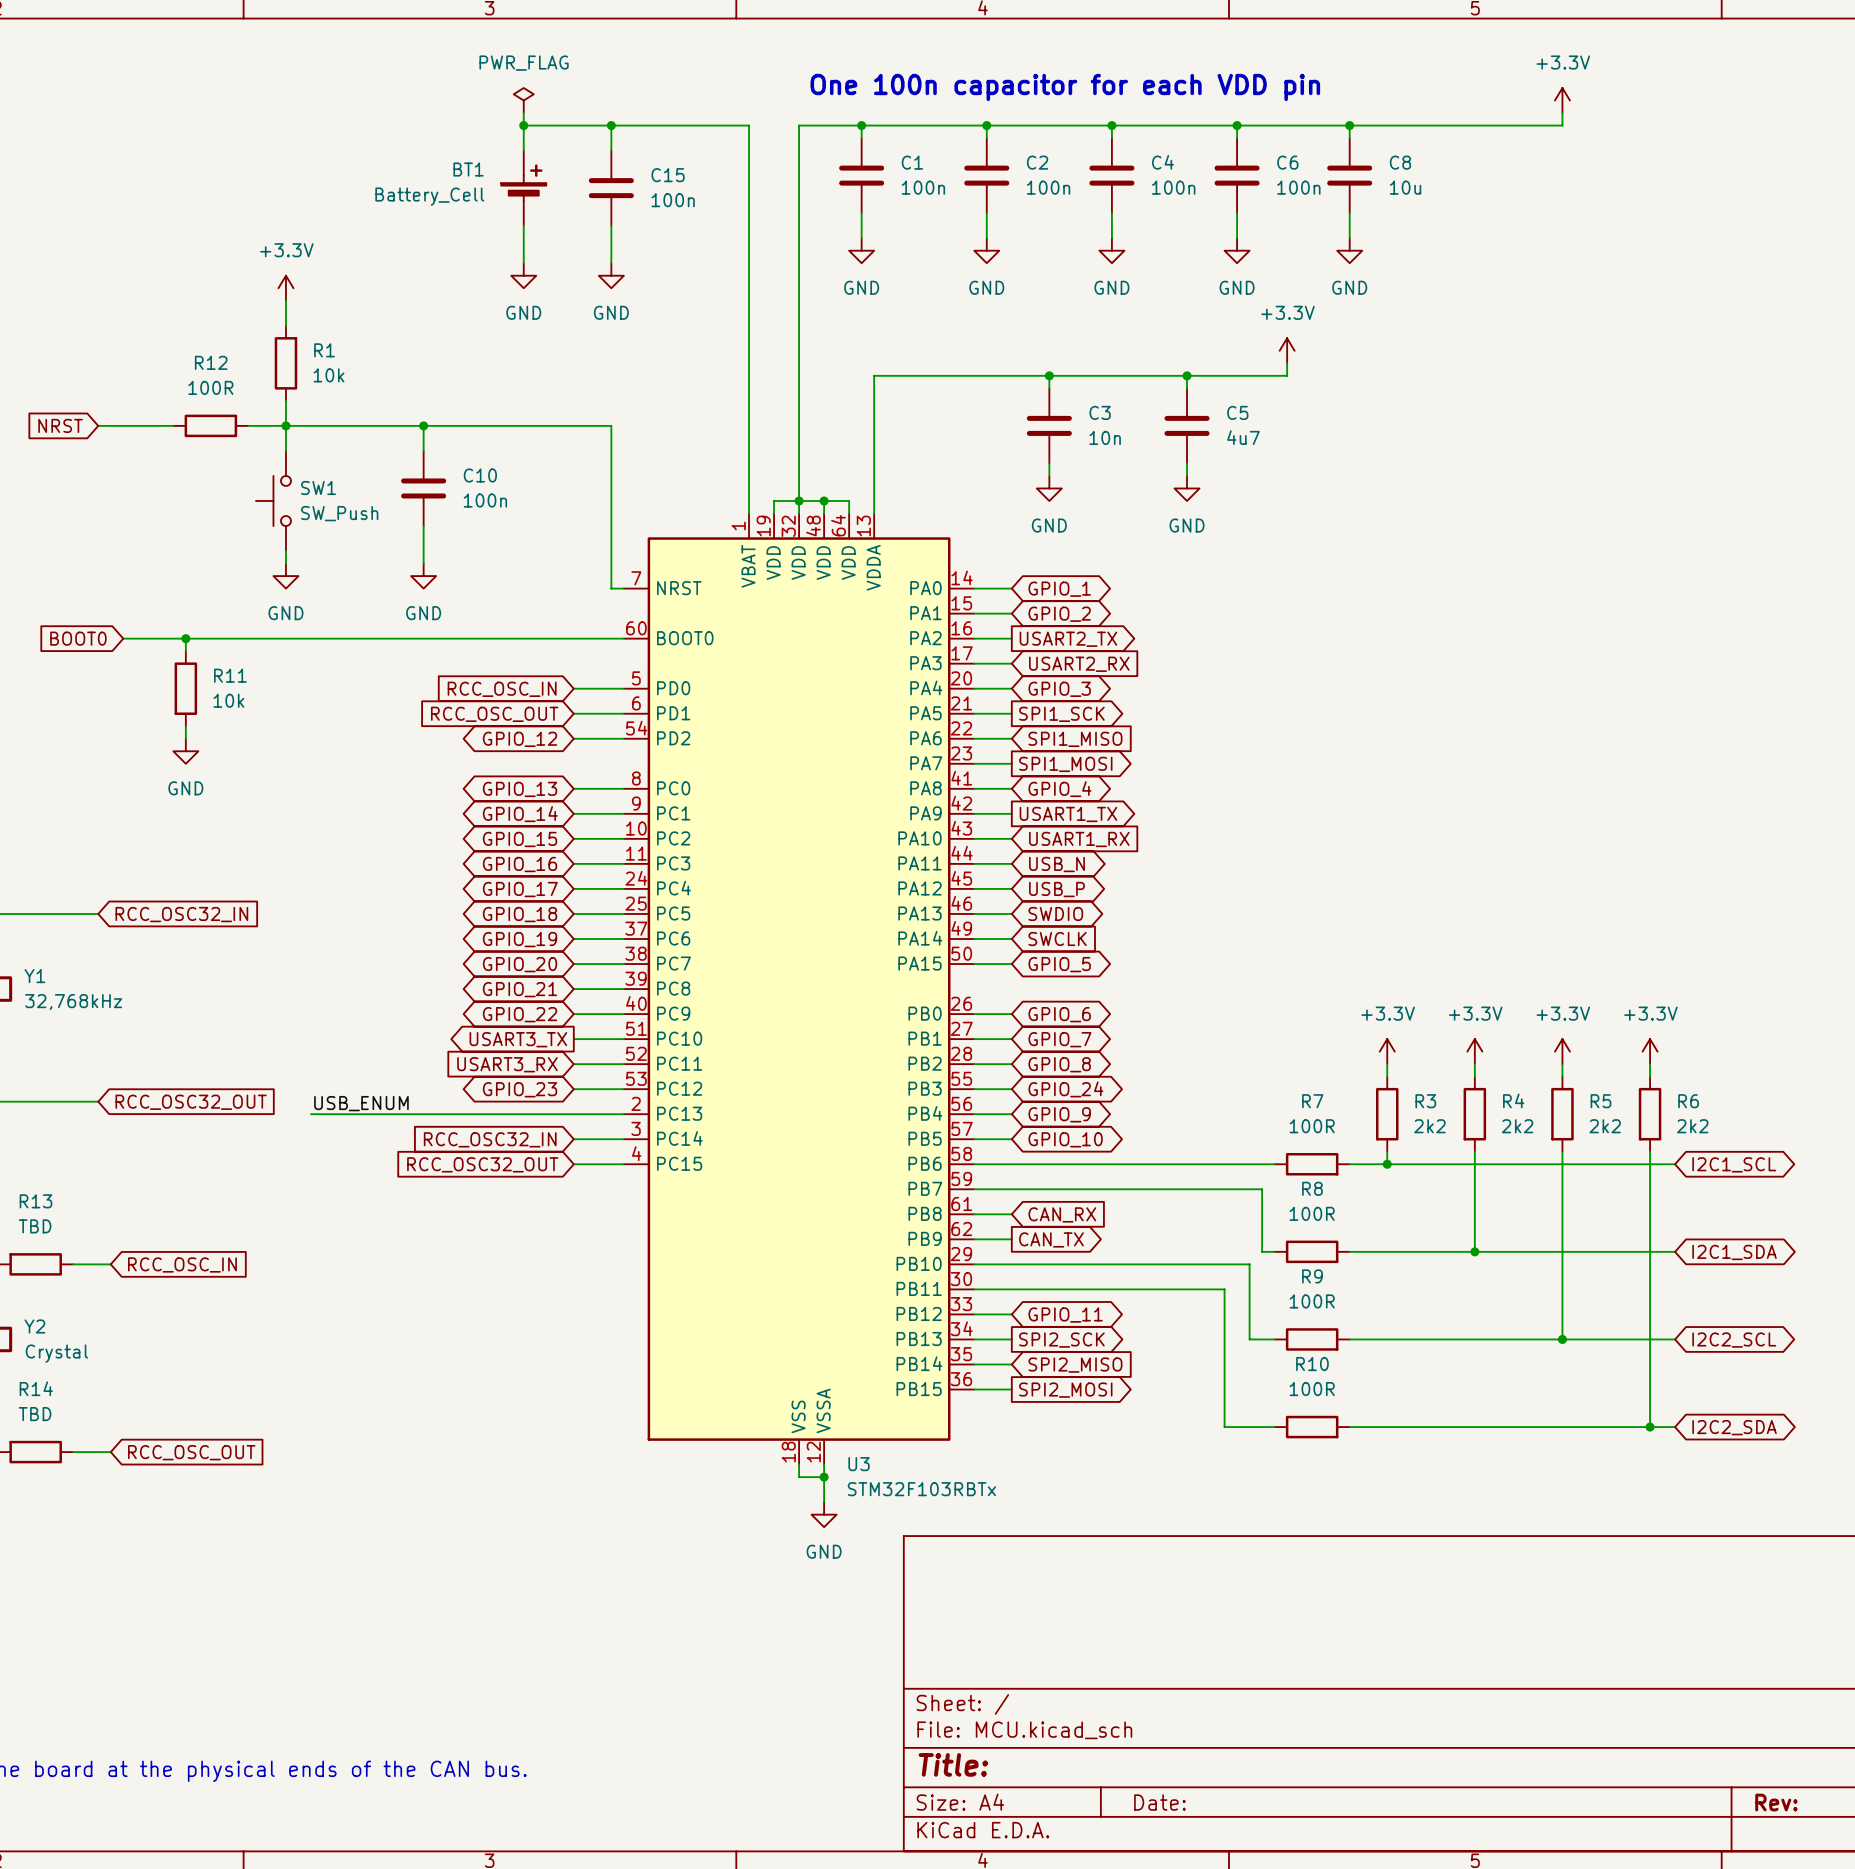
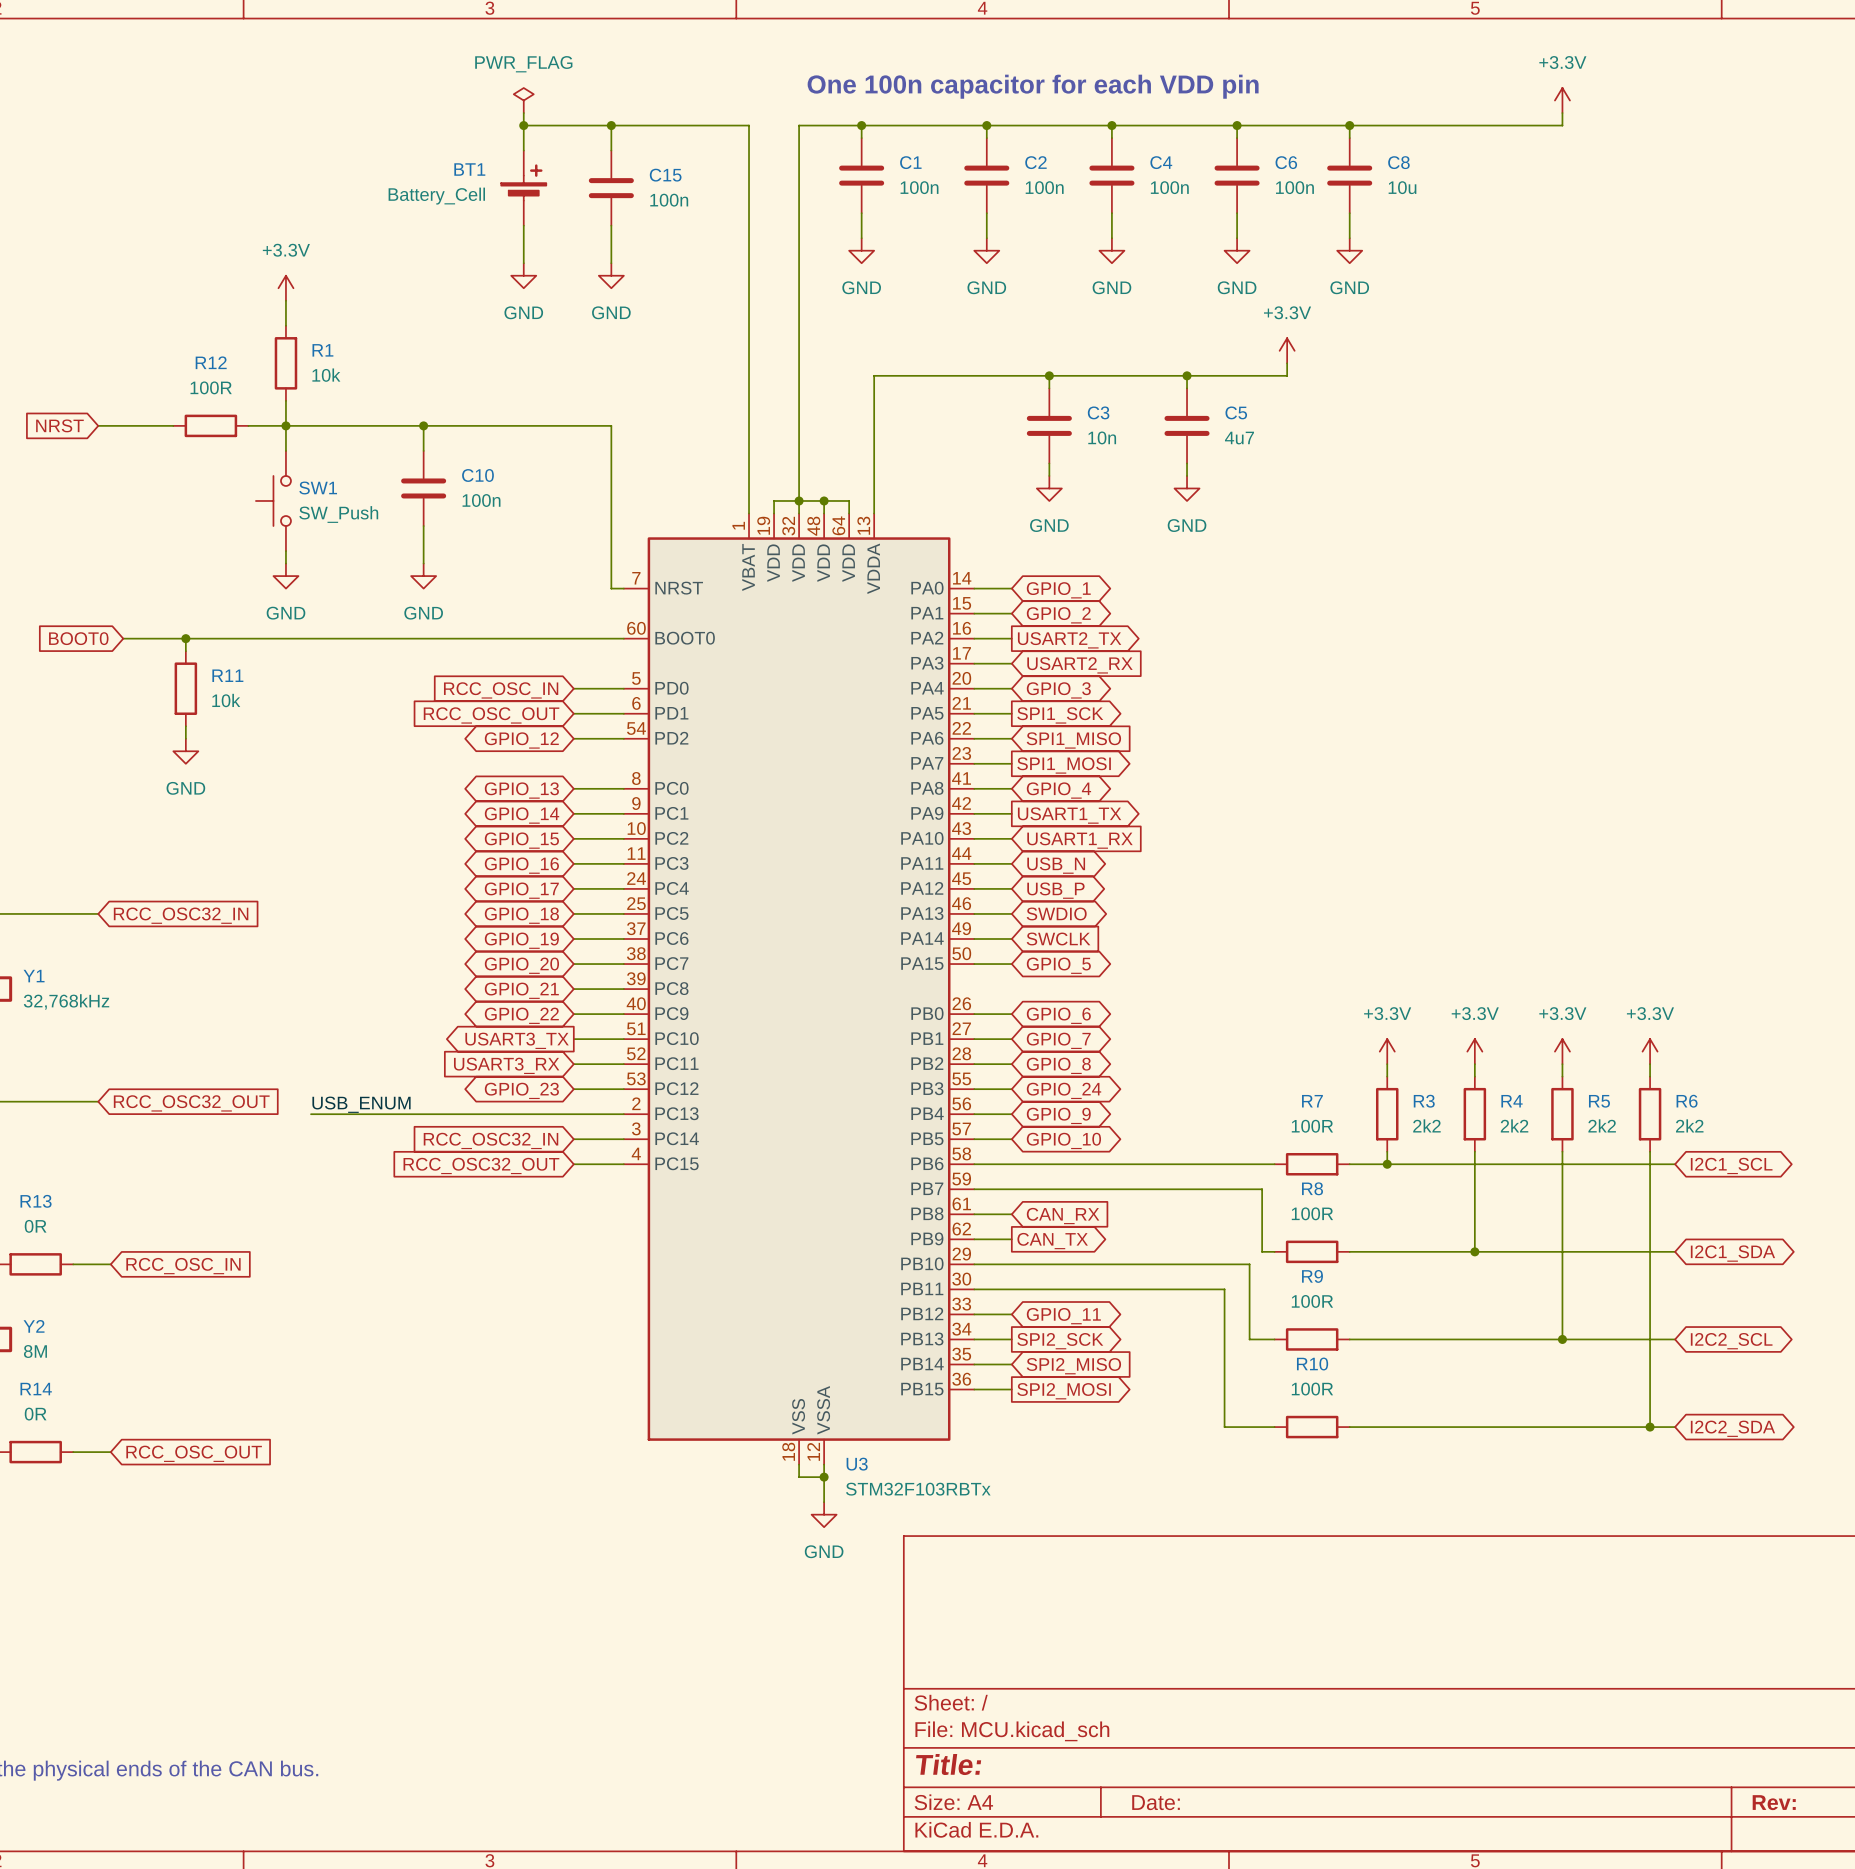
R13 value: TBD (35, 1226) -> 0R (35, 1226)
Y2 value: Crystal (56, 1353) -> 8M (35, 1351)
R14 value: TBD (35, 1414) -> 0R (35, 1414)

